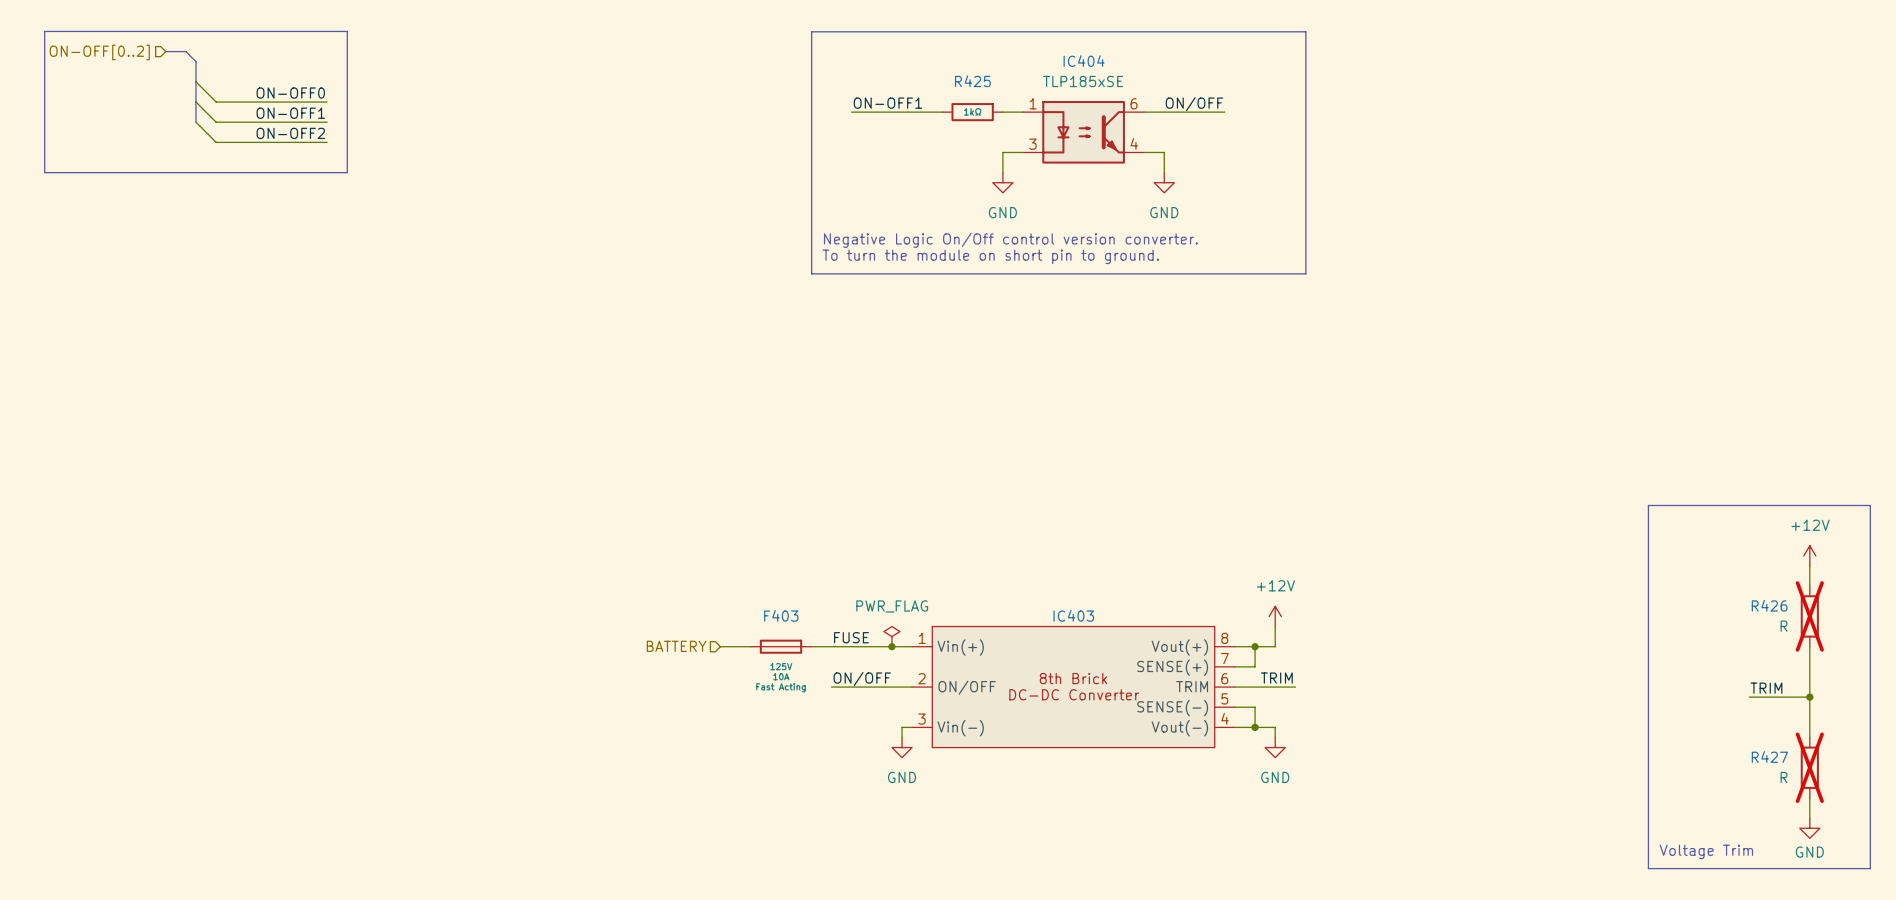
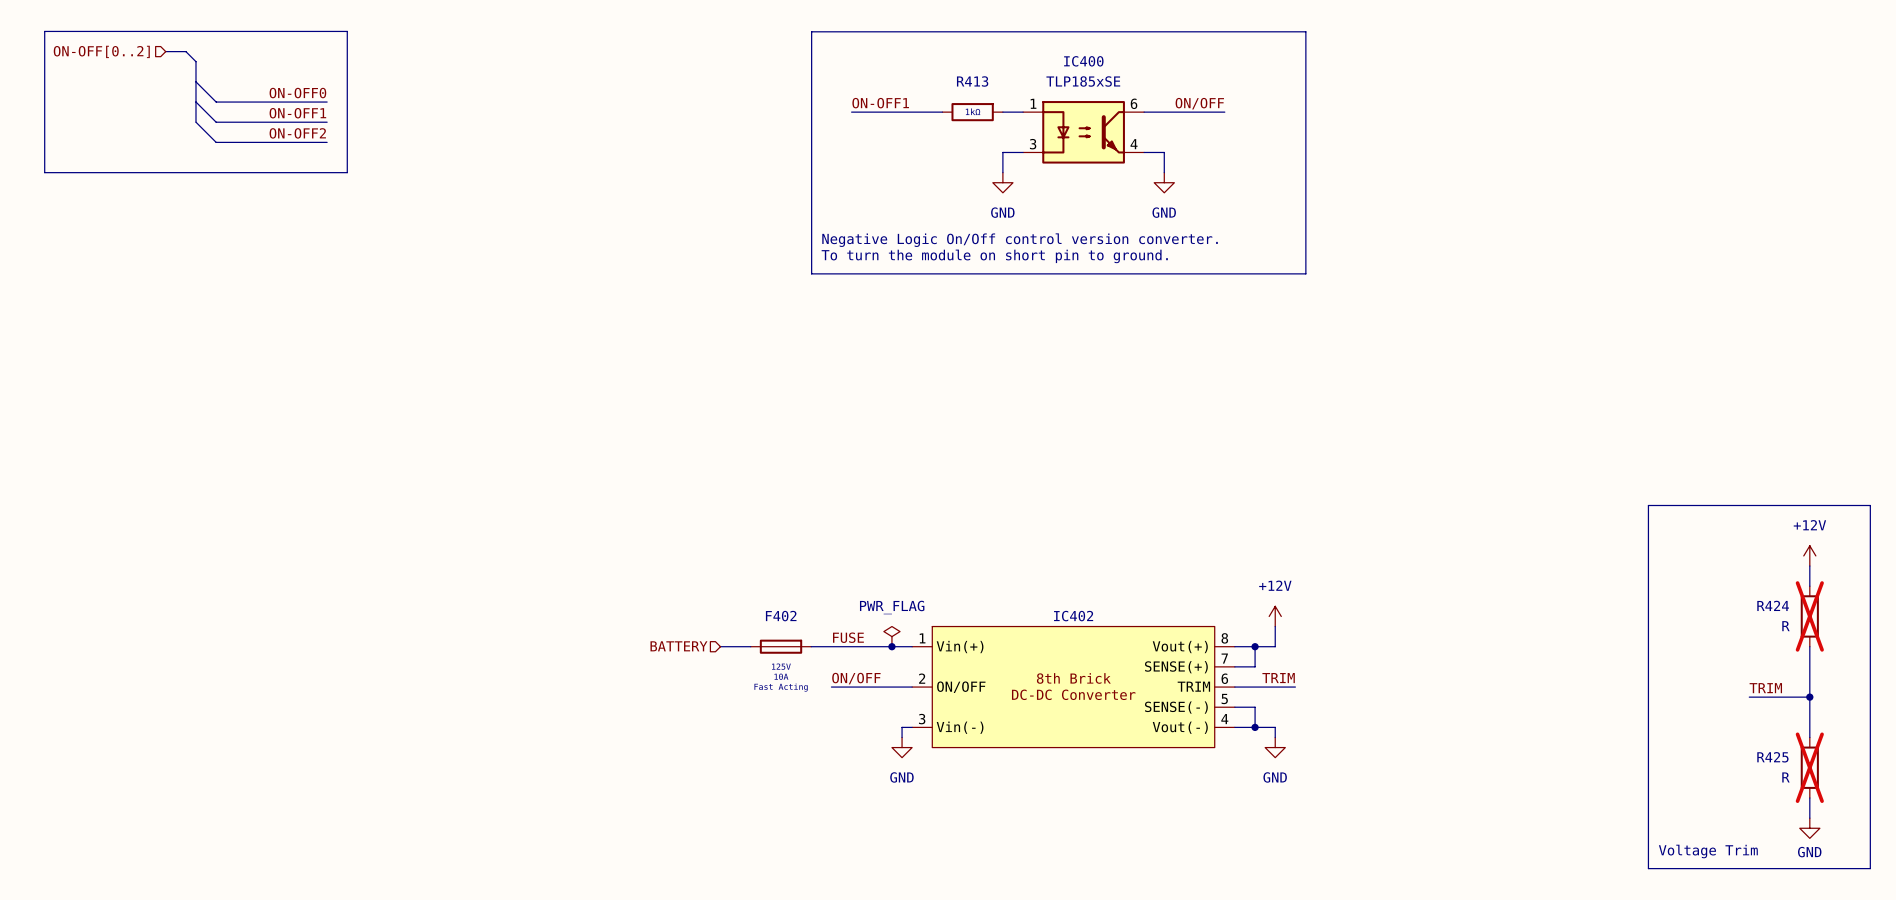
IC404 name: IC404 (1084, 61) -> IC400 (1083, 61)
R425 name: R425 (972, 81) -> R413 (972, 81)
R426 name: R426 (1769, 605) -> R424 (1773, 605)
F403 name: F403 (781, 615) -> F402 (781, 616)
IC403 name: IC403 (1073, 615) -> IC402 (1073, 616)
R427 name: R427 (1769, 757) -> R425 (1772, 757)

